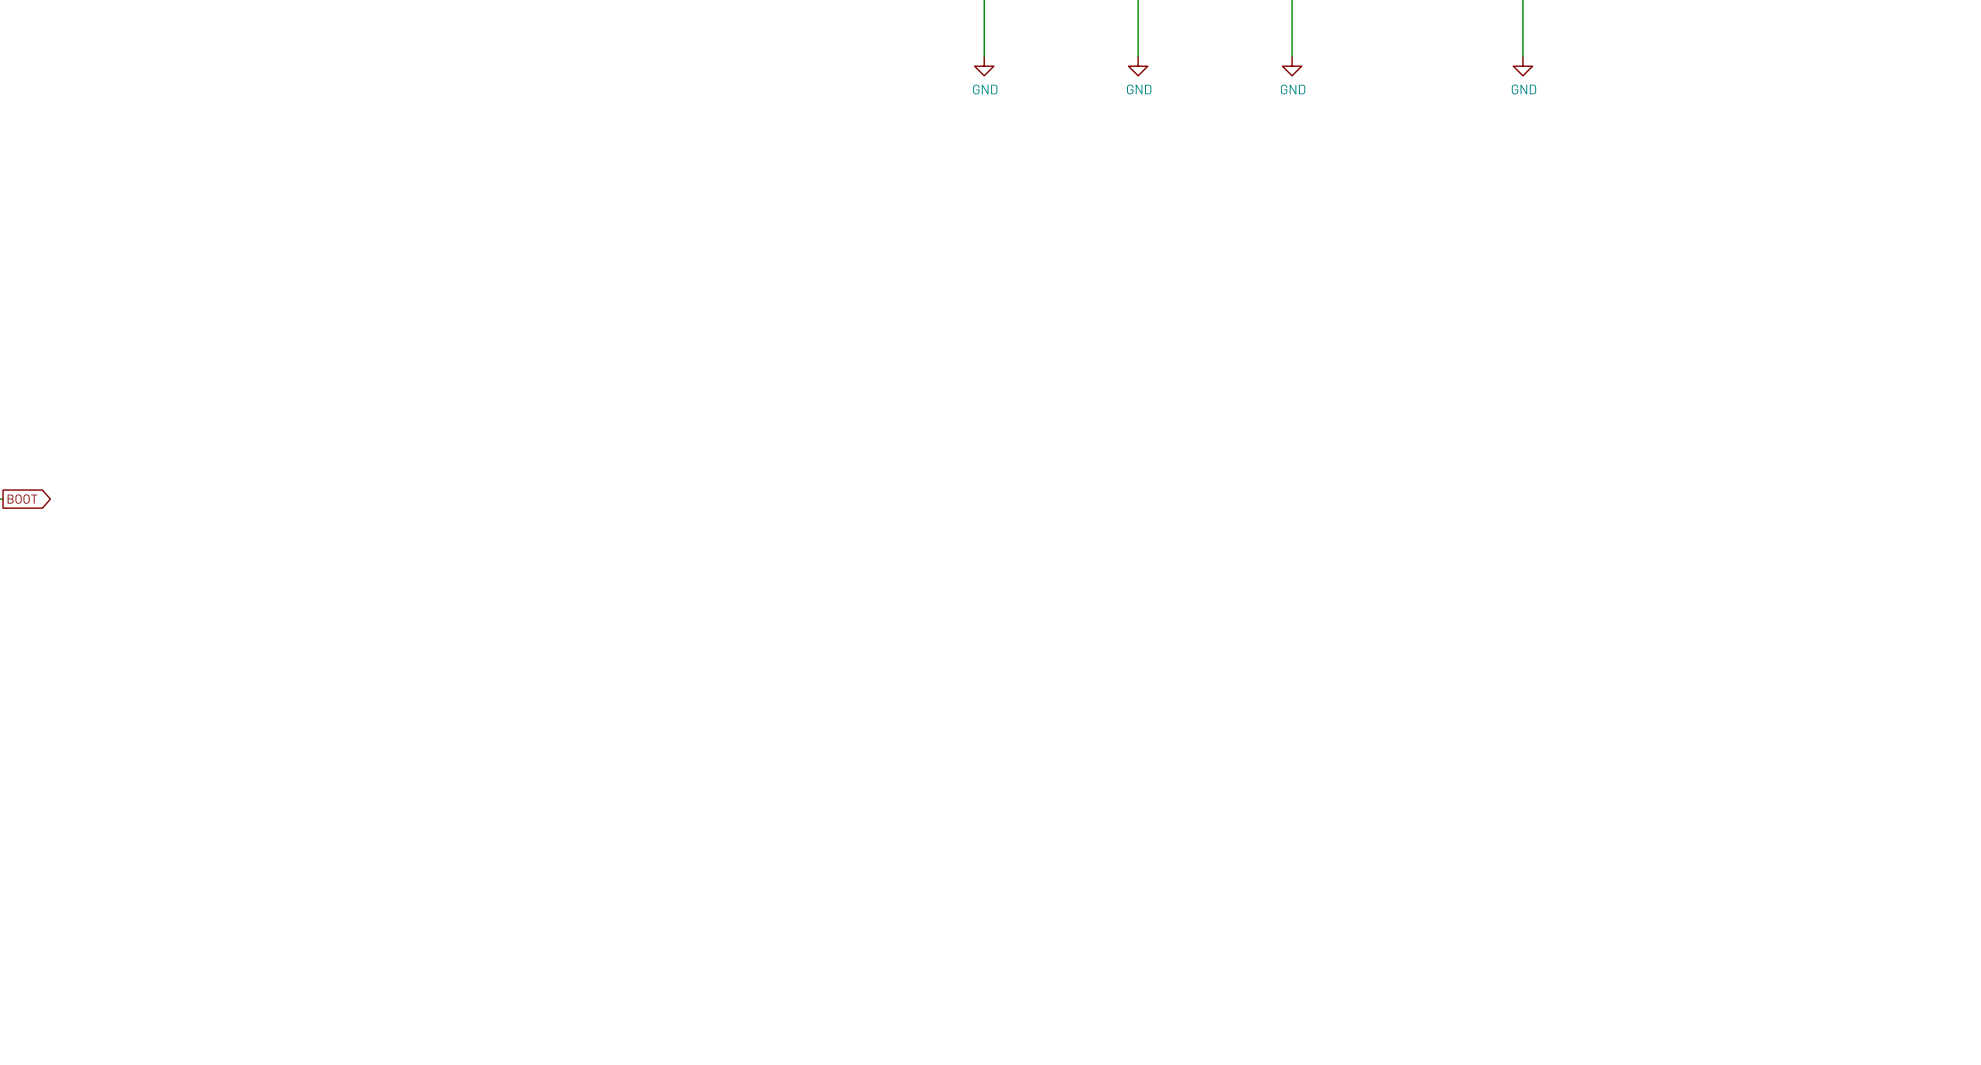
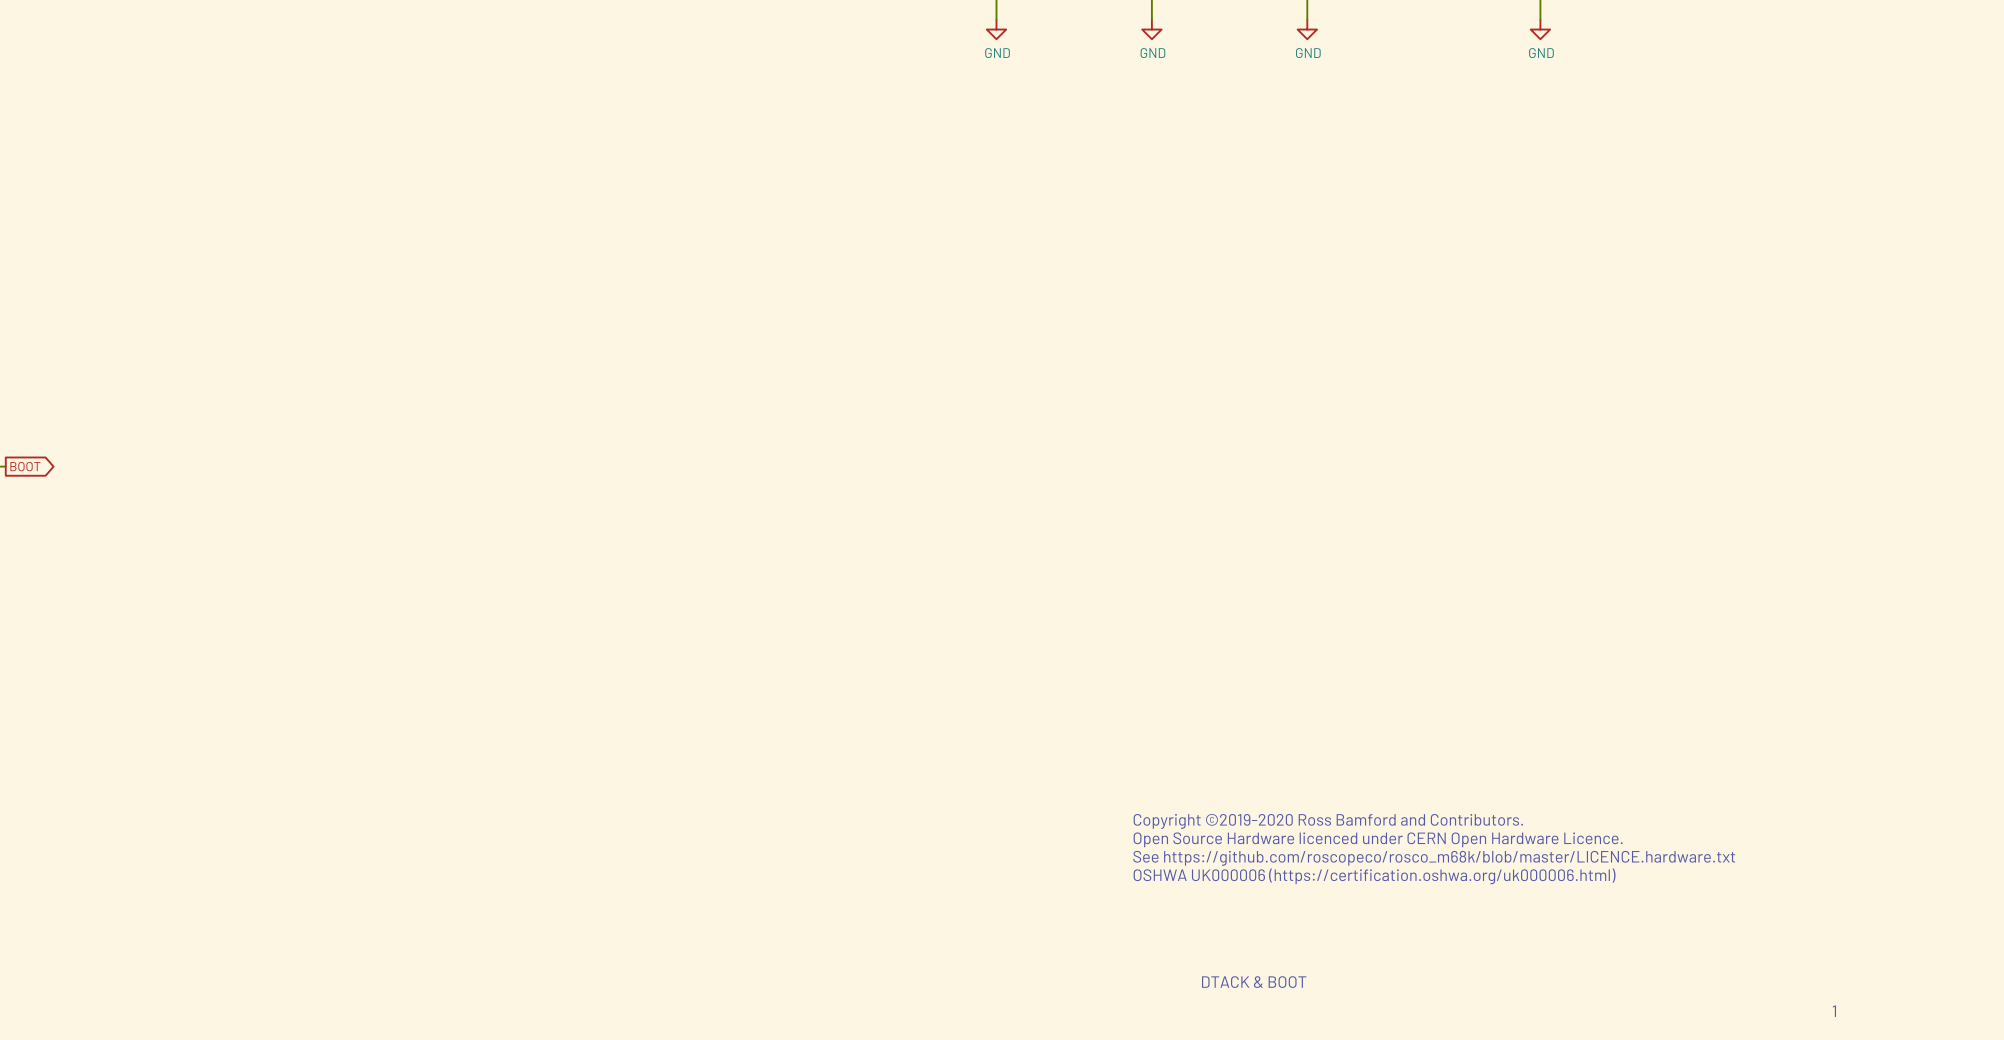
text: none -> Copyright ©2019-2020 Ross Bamford and Contributors. (1328, 821)
text: none -> Open Source Hardware licenced under CERN Open Hardware Licence. (1378, 839)
text: none -> See https://github.com/roscopeco/rosco_m68k/blob/master/LICENCE.hardware.txt (1434, 858)
text: none -> OSHWA UK000006 (https://certification.oshwa.org/uk000006.html) (1374, 876)
text: none -> DTACK & BOOT (1254, 982)
text: none -> 1 (1834, 1011)

